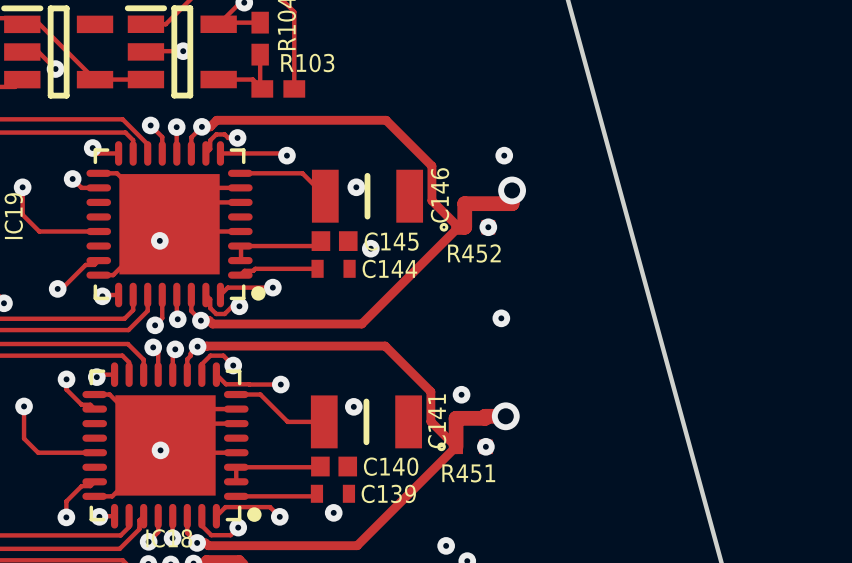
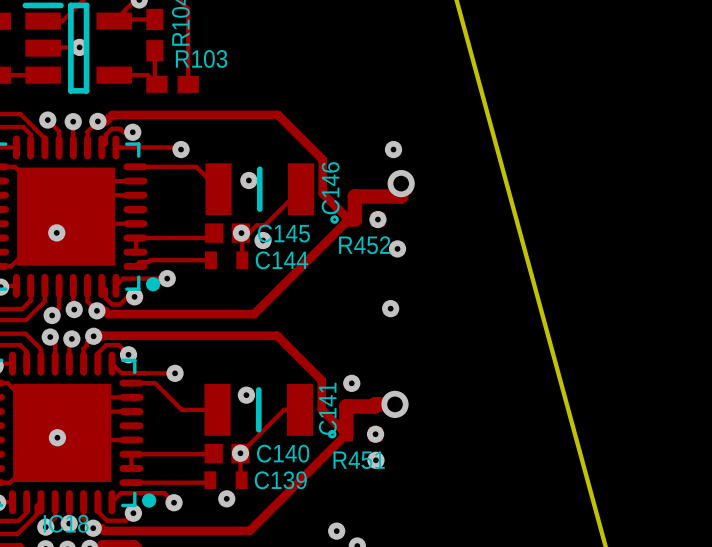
track: none -> (301, 189) (264, 225) (256, 225) (249, 233) (240, 233) (242, 260)
via: none -> (241, 233)
via: none -> (397, 248)
track: none -> (300, 409) (284, 409) (240, 453) (241, 480)
via: none -> (240, 453)
via: none -> (375, 460)

